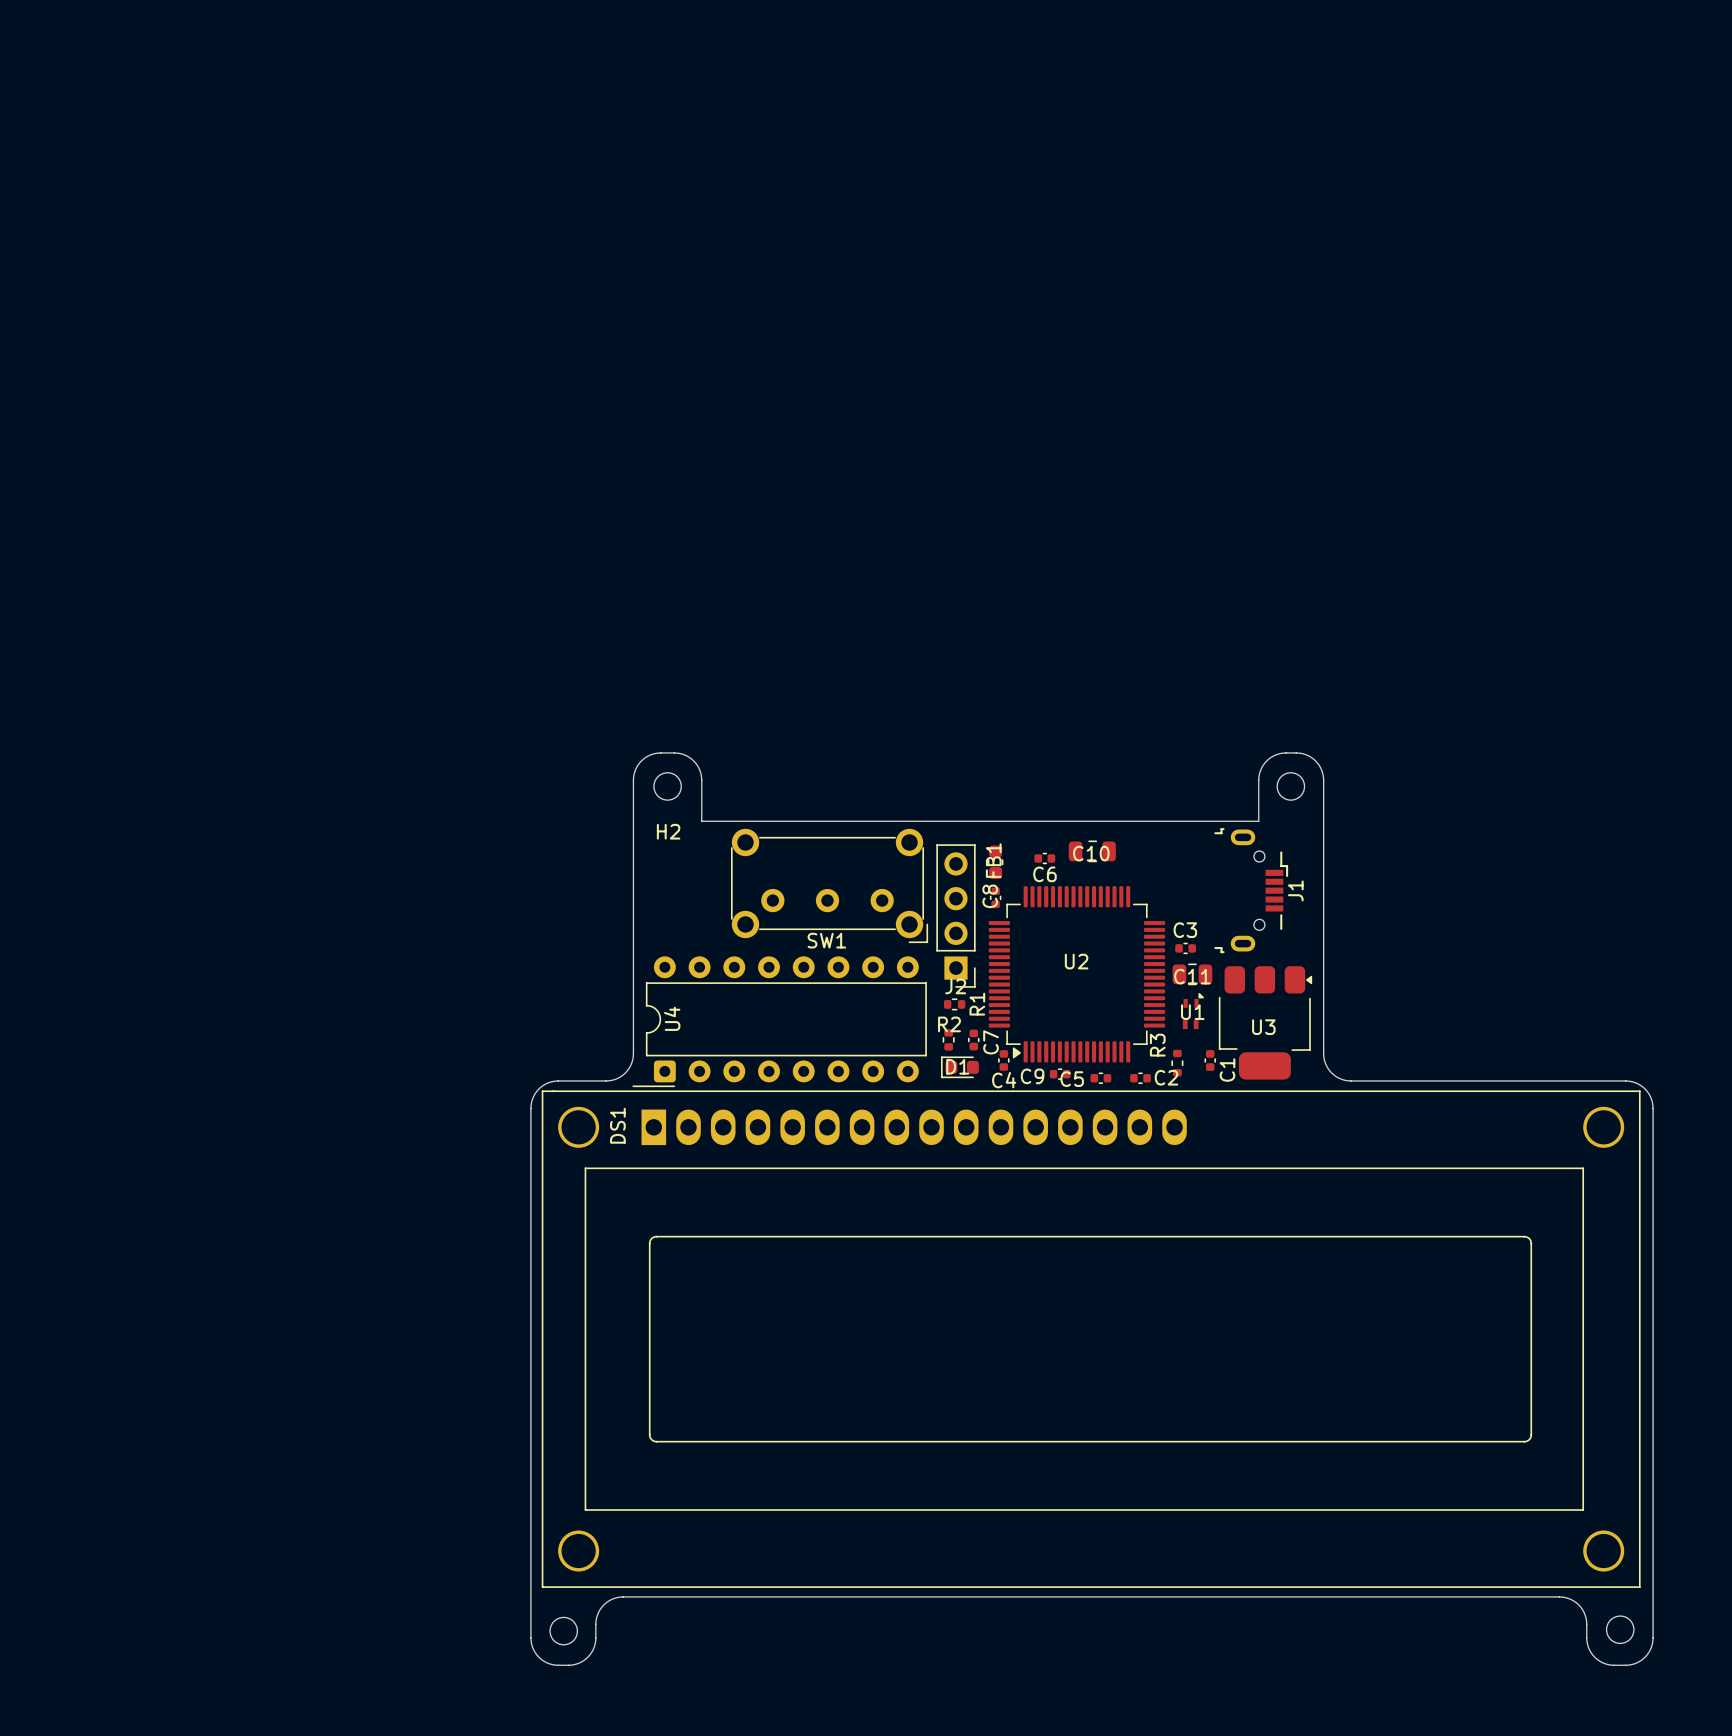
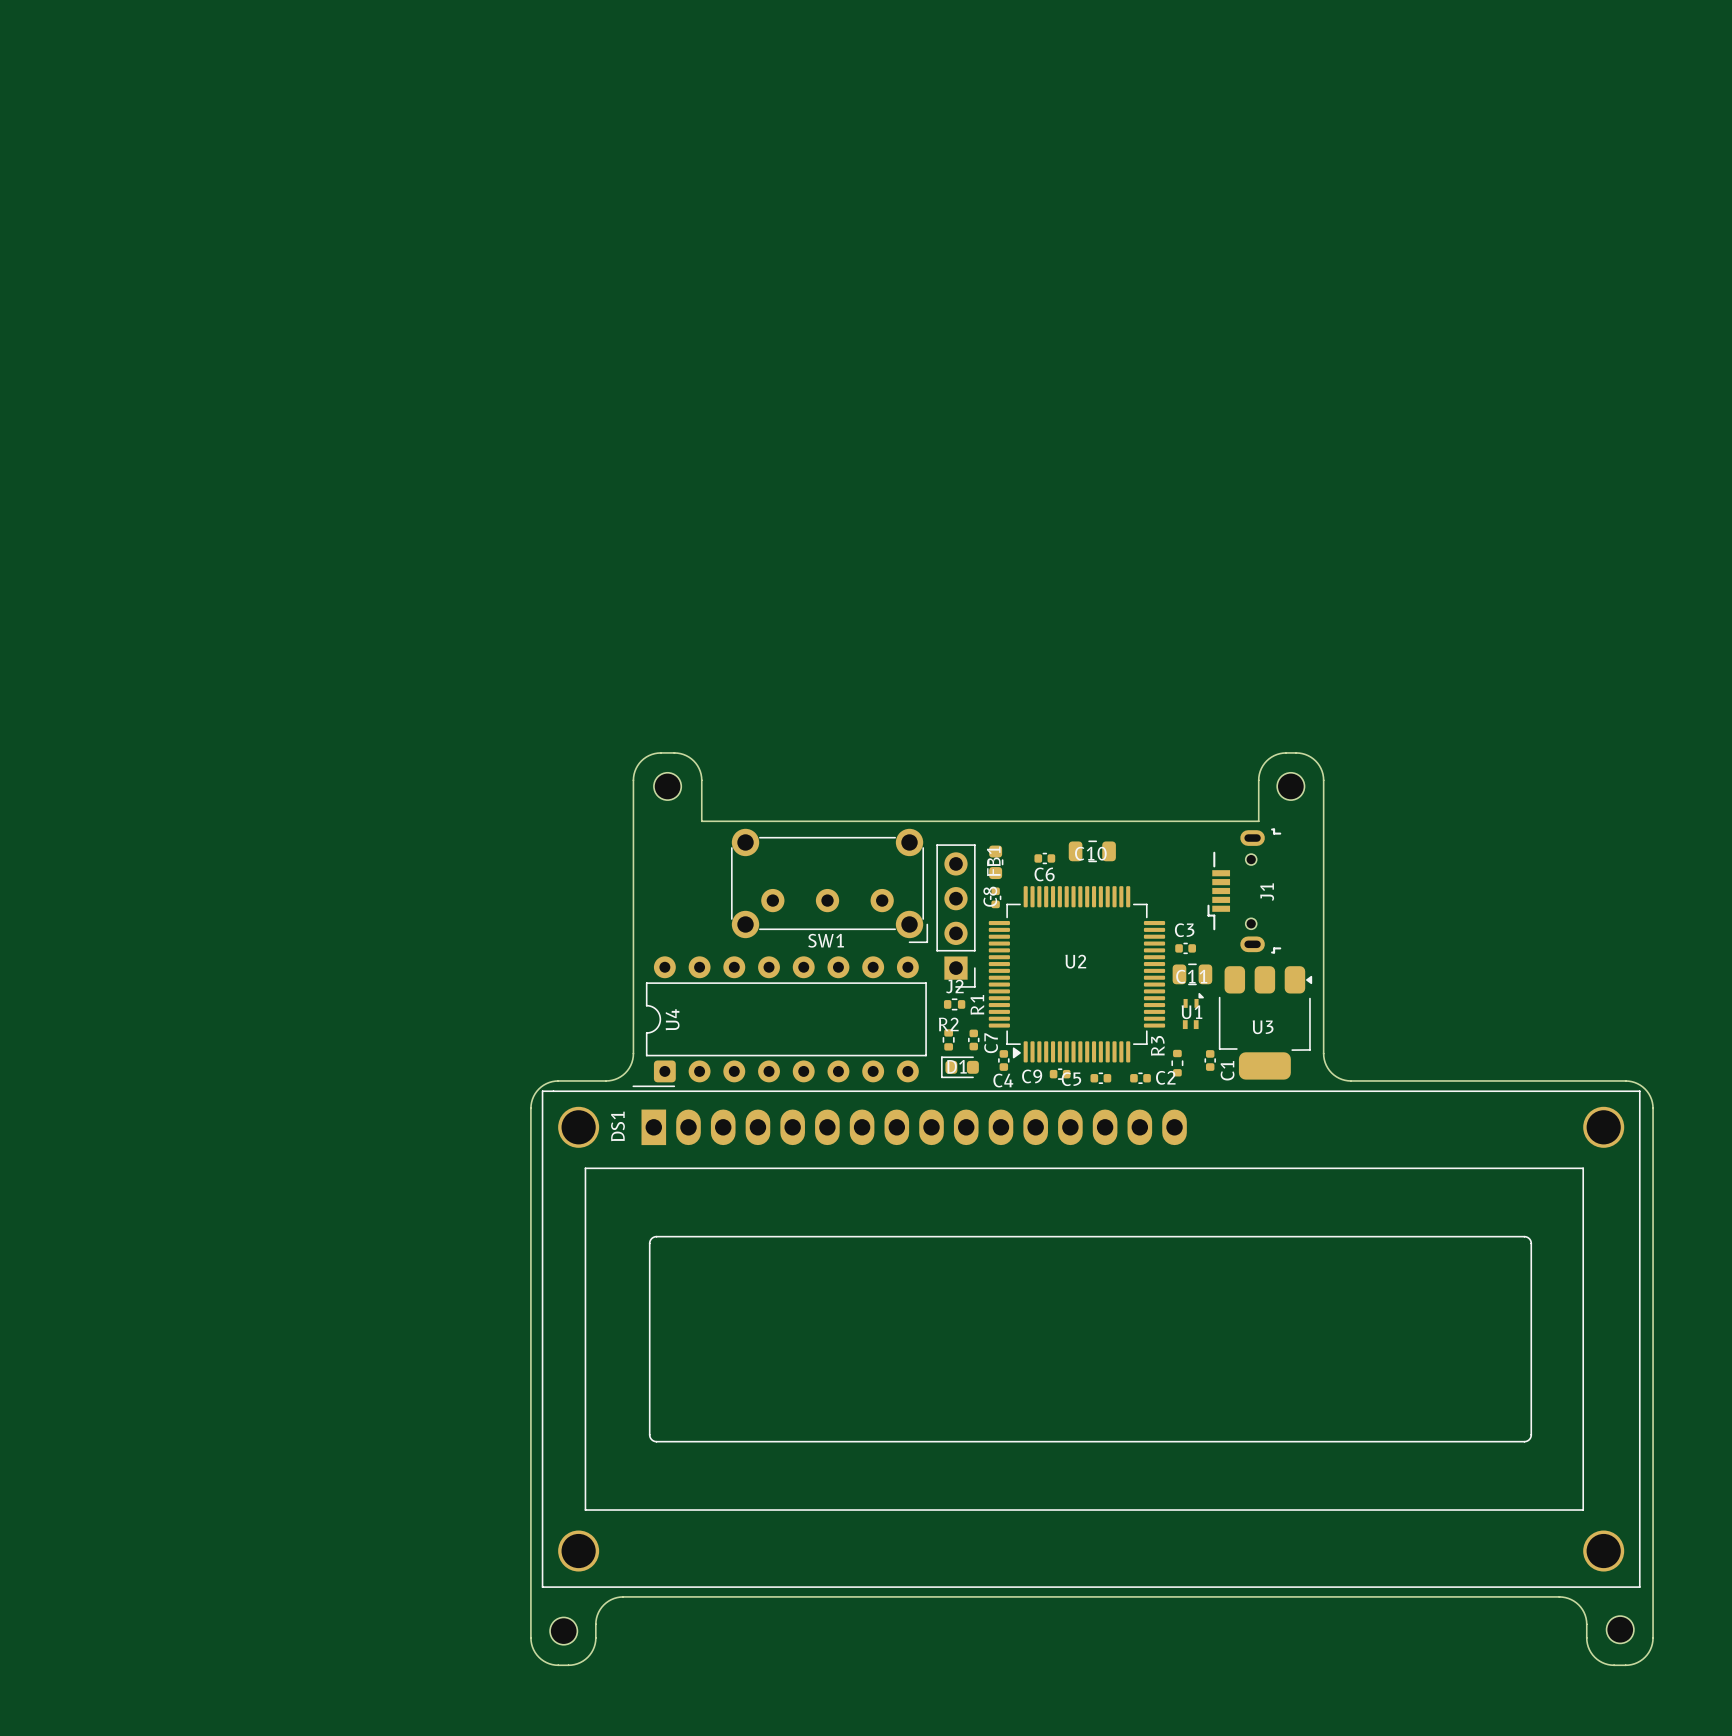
J1 footprint: [1214, 828, 1289, 954] -> [1207, 828, 1282, 954]
H2 name: H2 (668, 831) -> none

